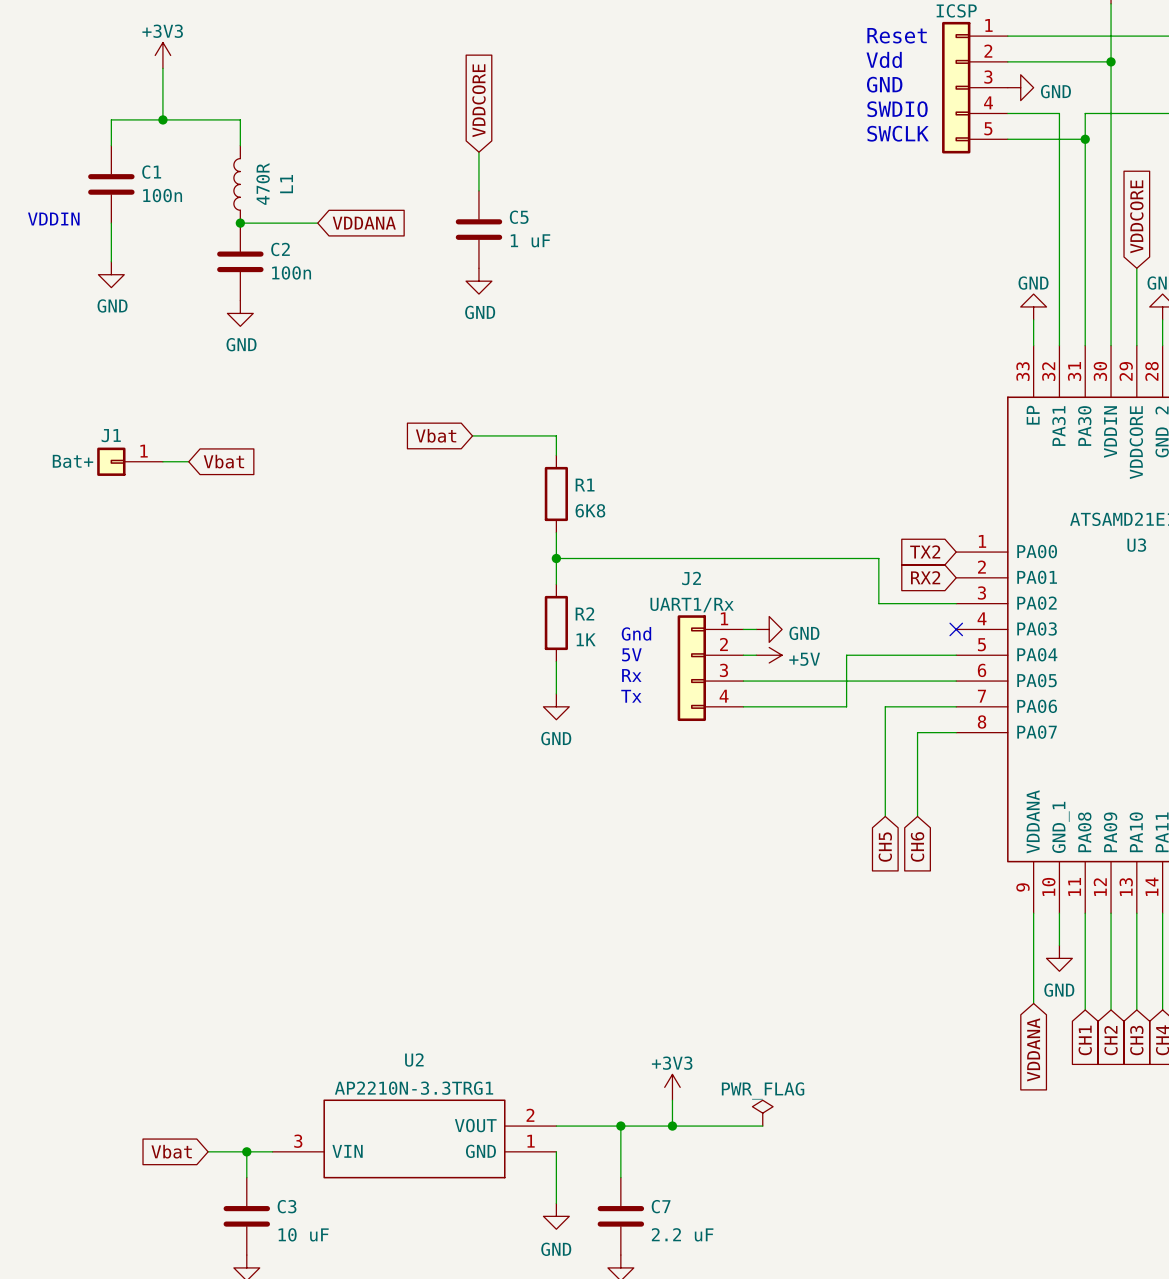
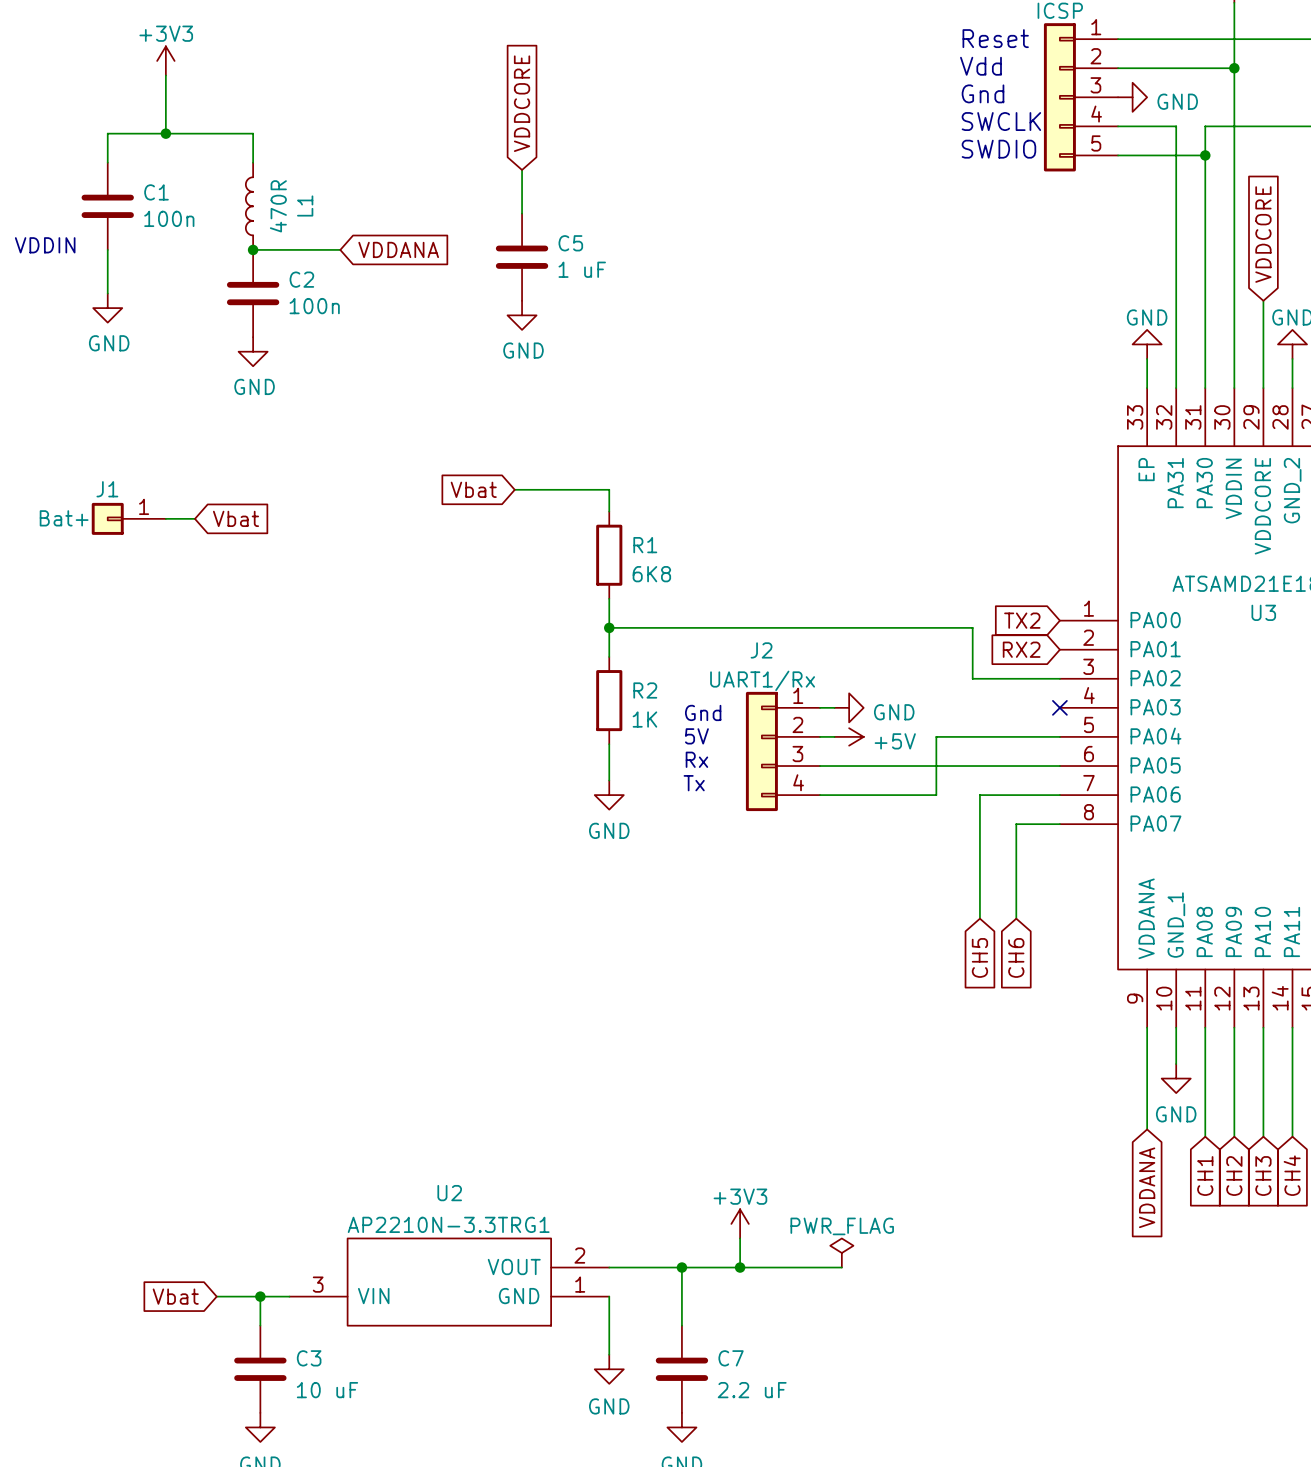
text: GND (884, 84) -> Gnd (983, 93)
text: SWDIO (897, 109) -> SWCLK (1001, 121)
text: SWCLK (898, 133) -> SWDIO (998, 149)

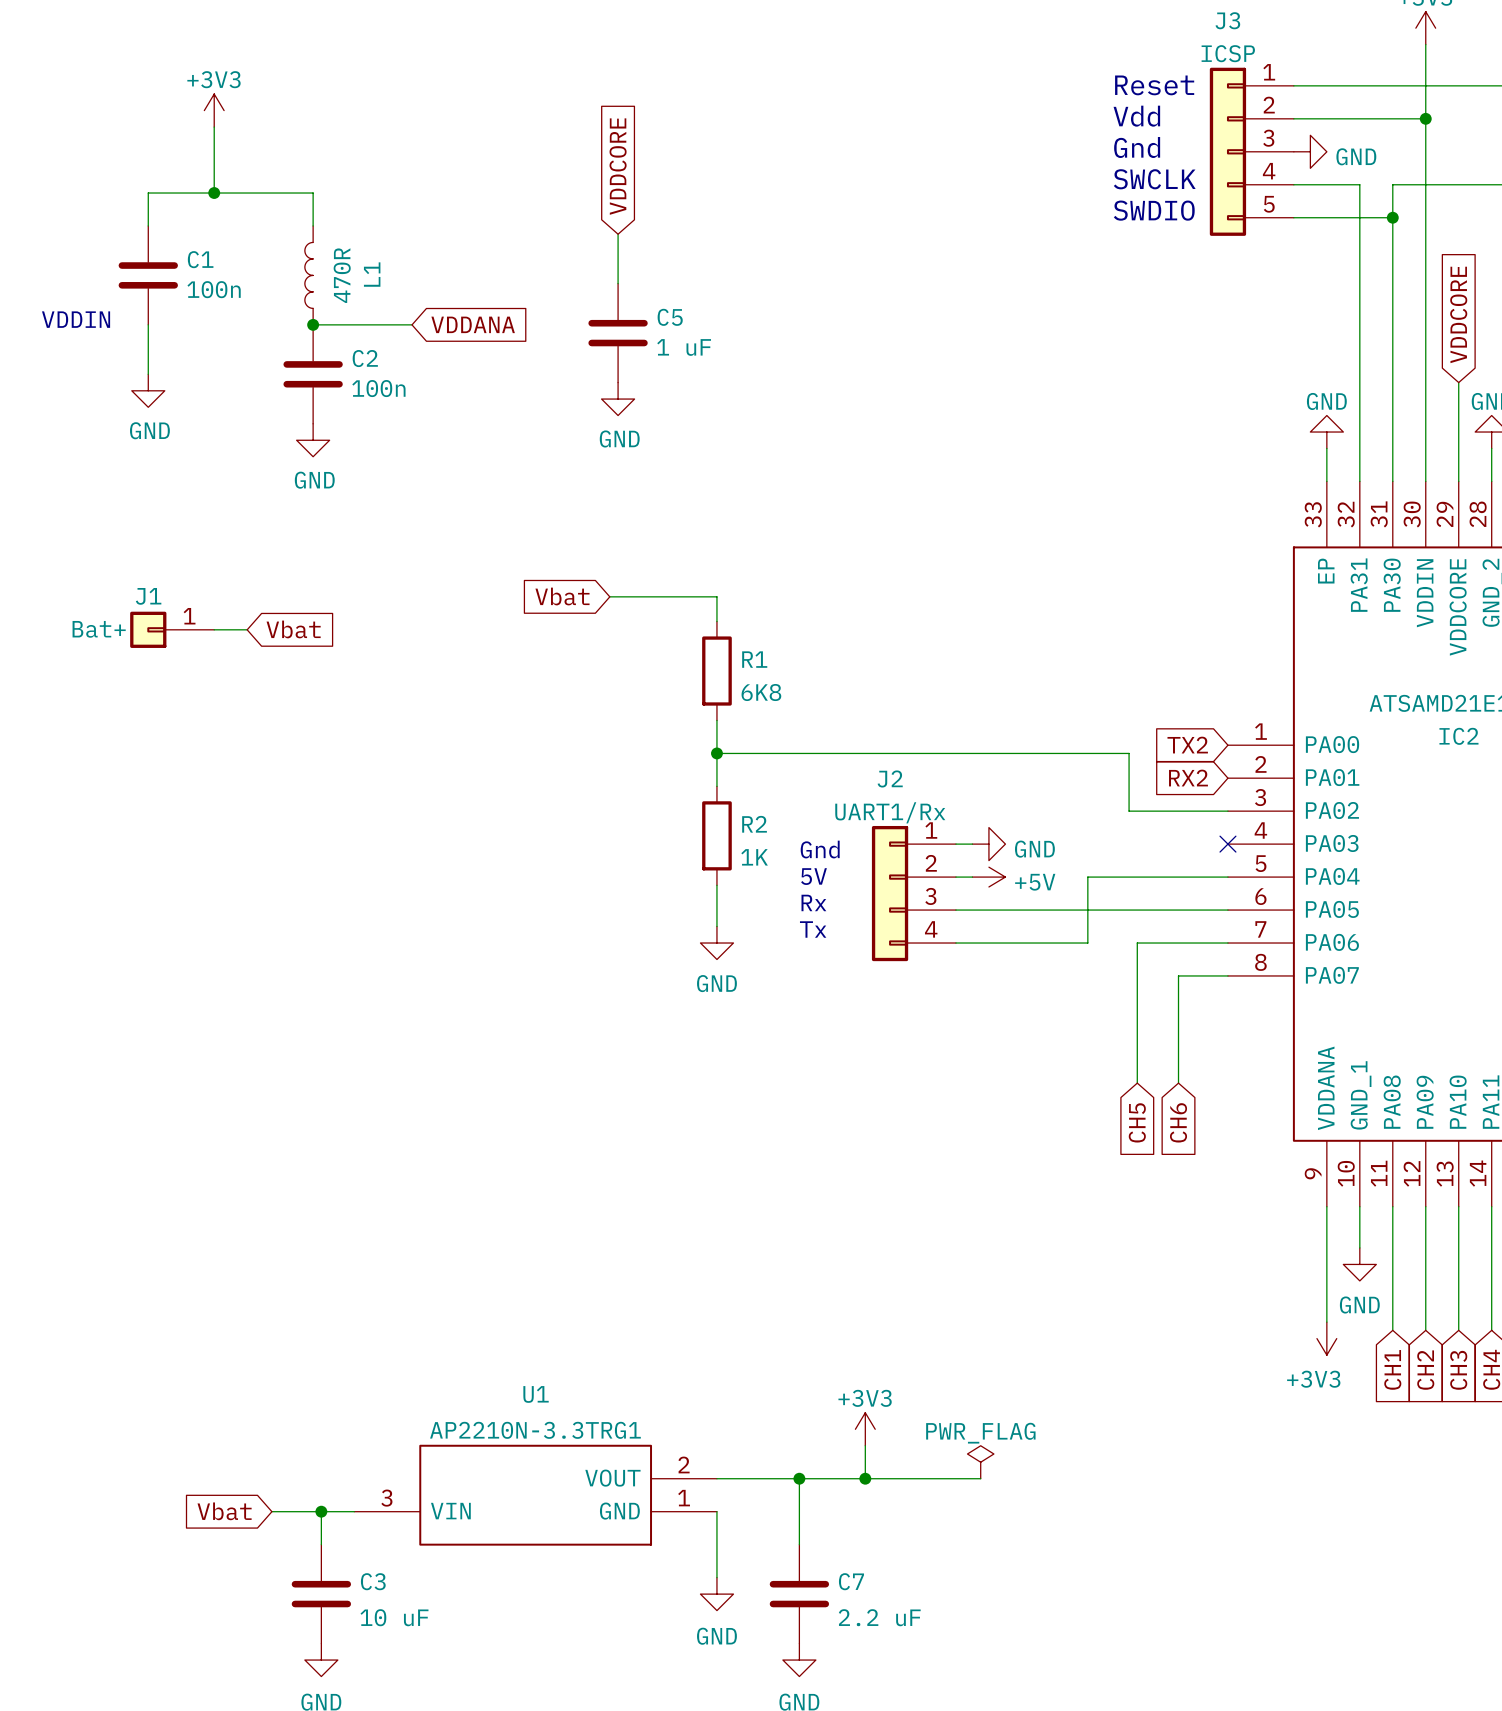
U3 name: U3 (1263, 612) -> IC2 (1458, 736)
power symbol: none -> +3V3 (1326, 1338)
global label: VDDANA (1147, 1187) -> none
U2 name: U2 (449, 1193) -> U1 (536, 1394)

